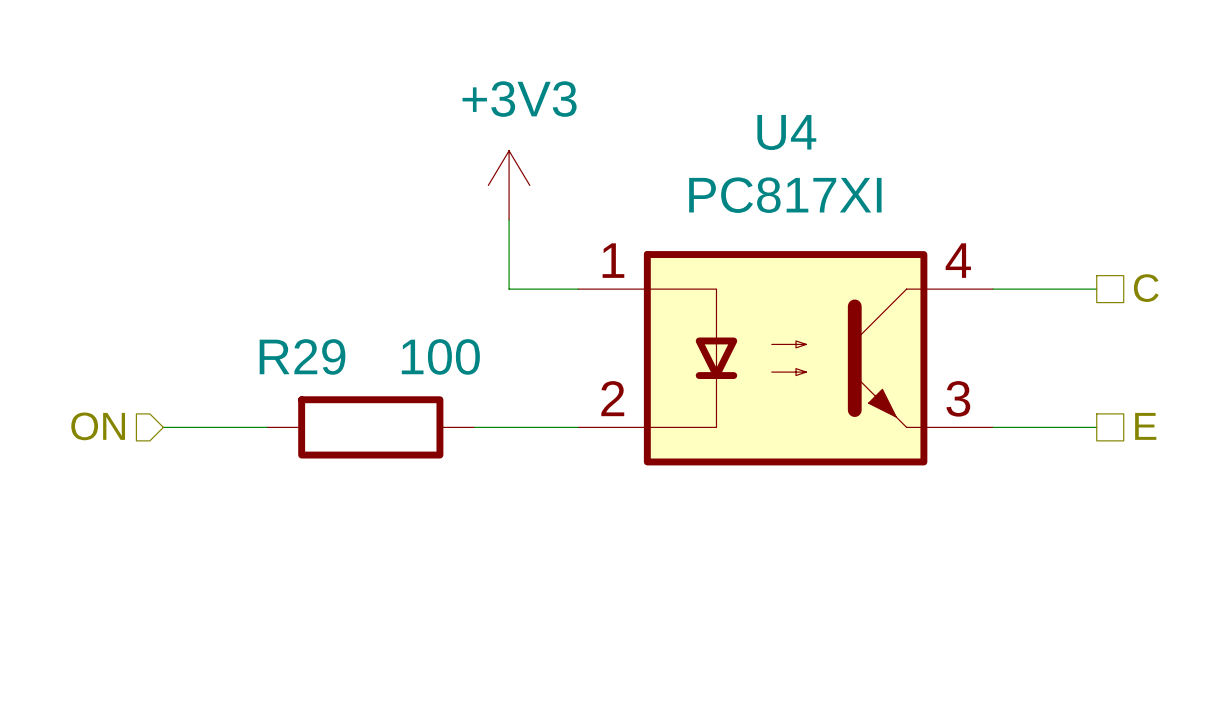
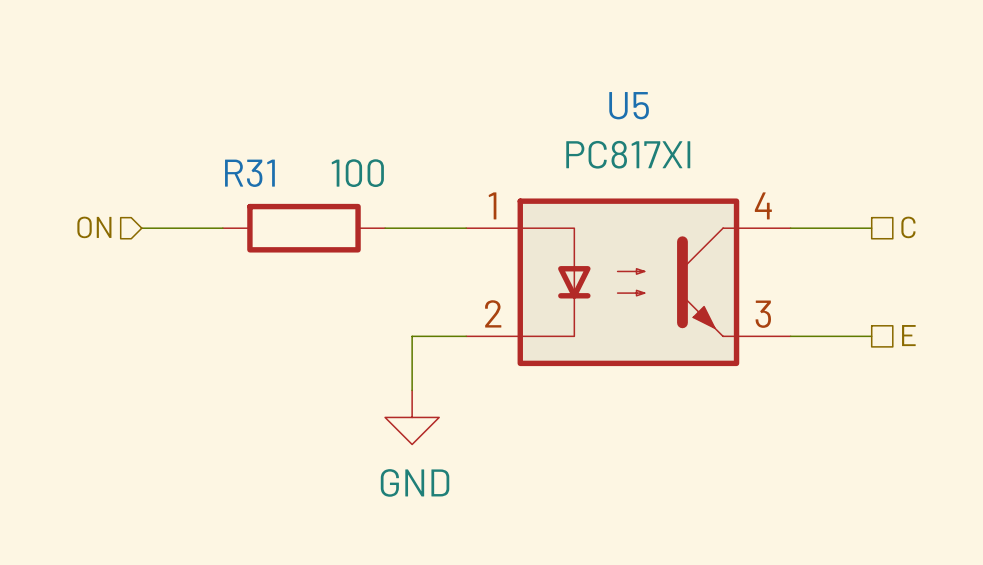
U4 name: U4 (786, 132) -> U5 (629, 105)
power symbol: +3V3 (509, 185) -> none
wire: (509, 219) (509, 289) -> (385, 228) (412, 228)
R31: none -> 100 (303, 228)
hierarchical label position: ON (98, 426) -> ON (94, 227)
wire: (163, 427) (267, 427) -> (141, 228) (222, 228)
R29: 100 (370, 427) -> none
wire: (474, 427) (509, 427) -> (412, 390) (412, 336)
power symbol: none -> GND (412, 417)

